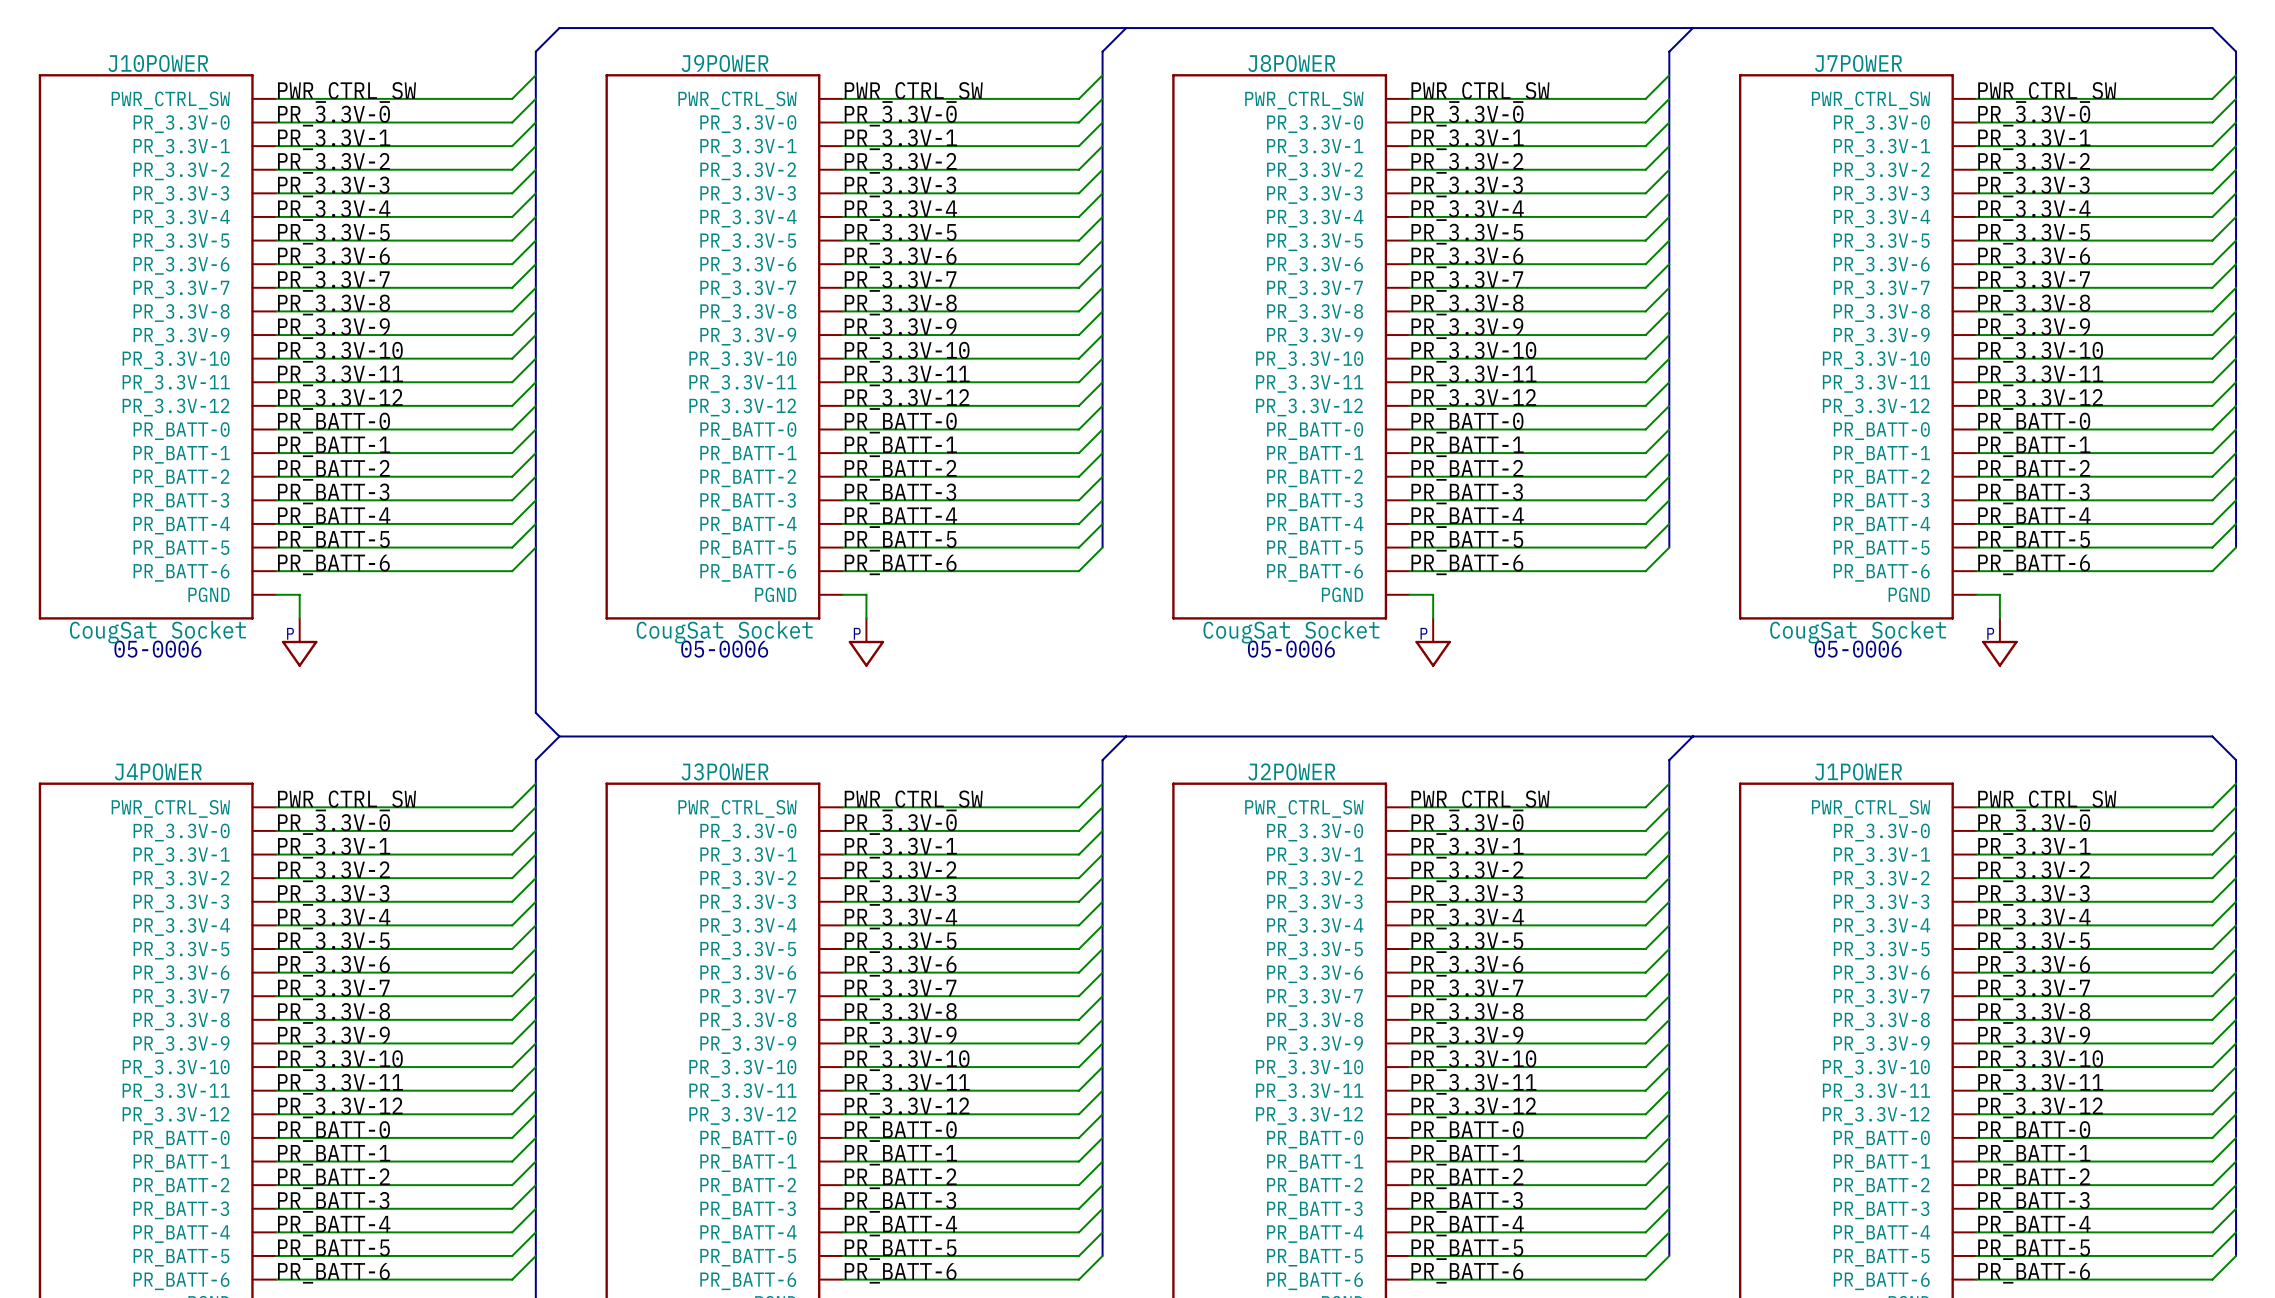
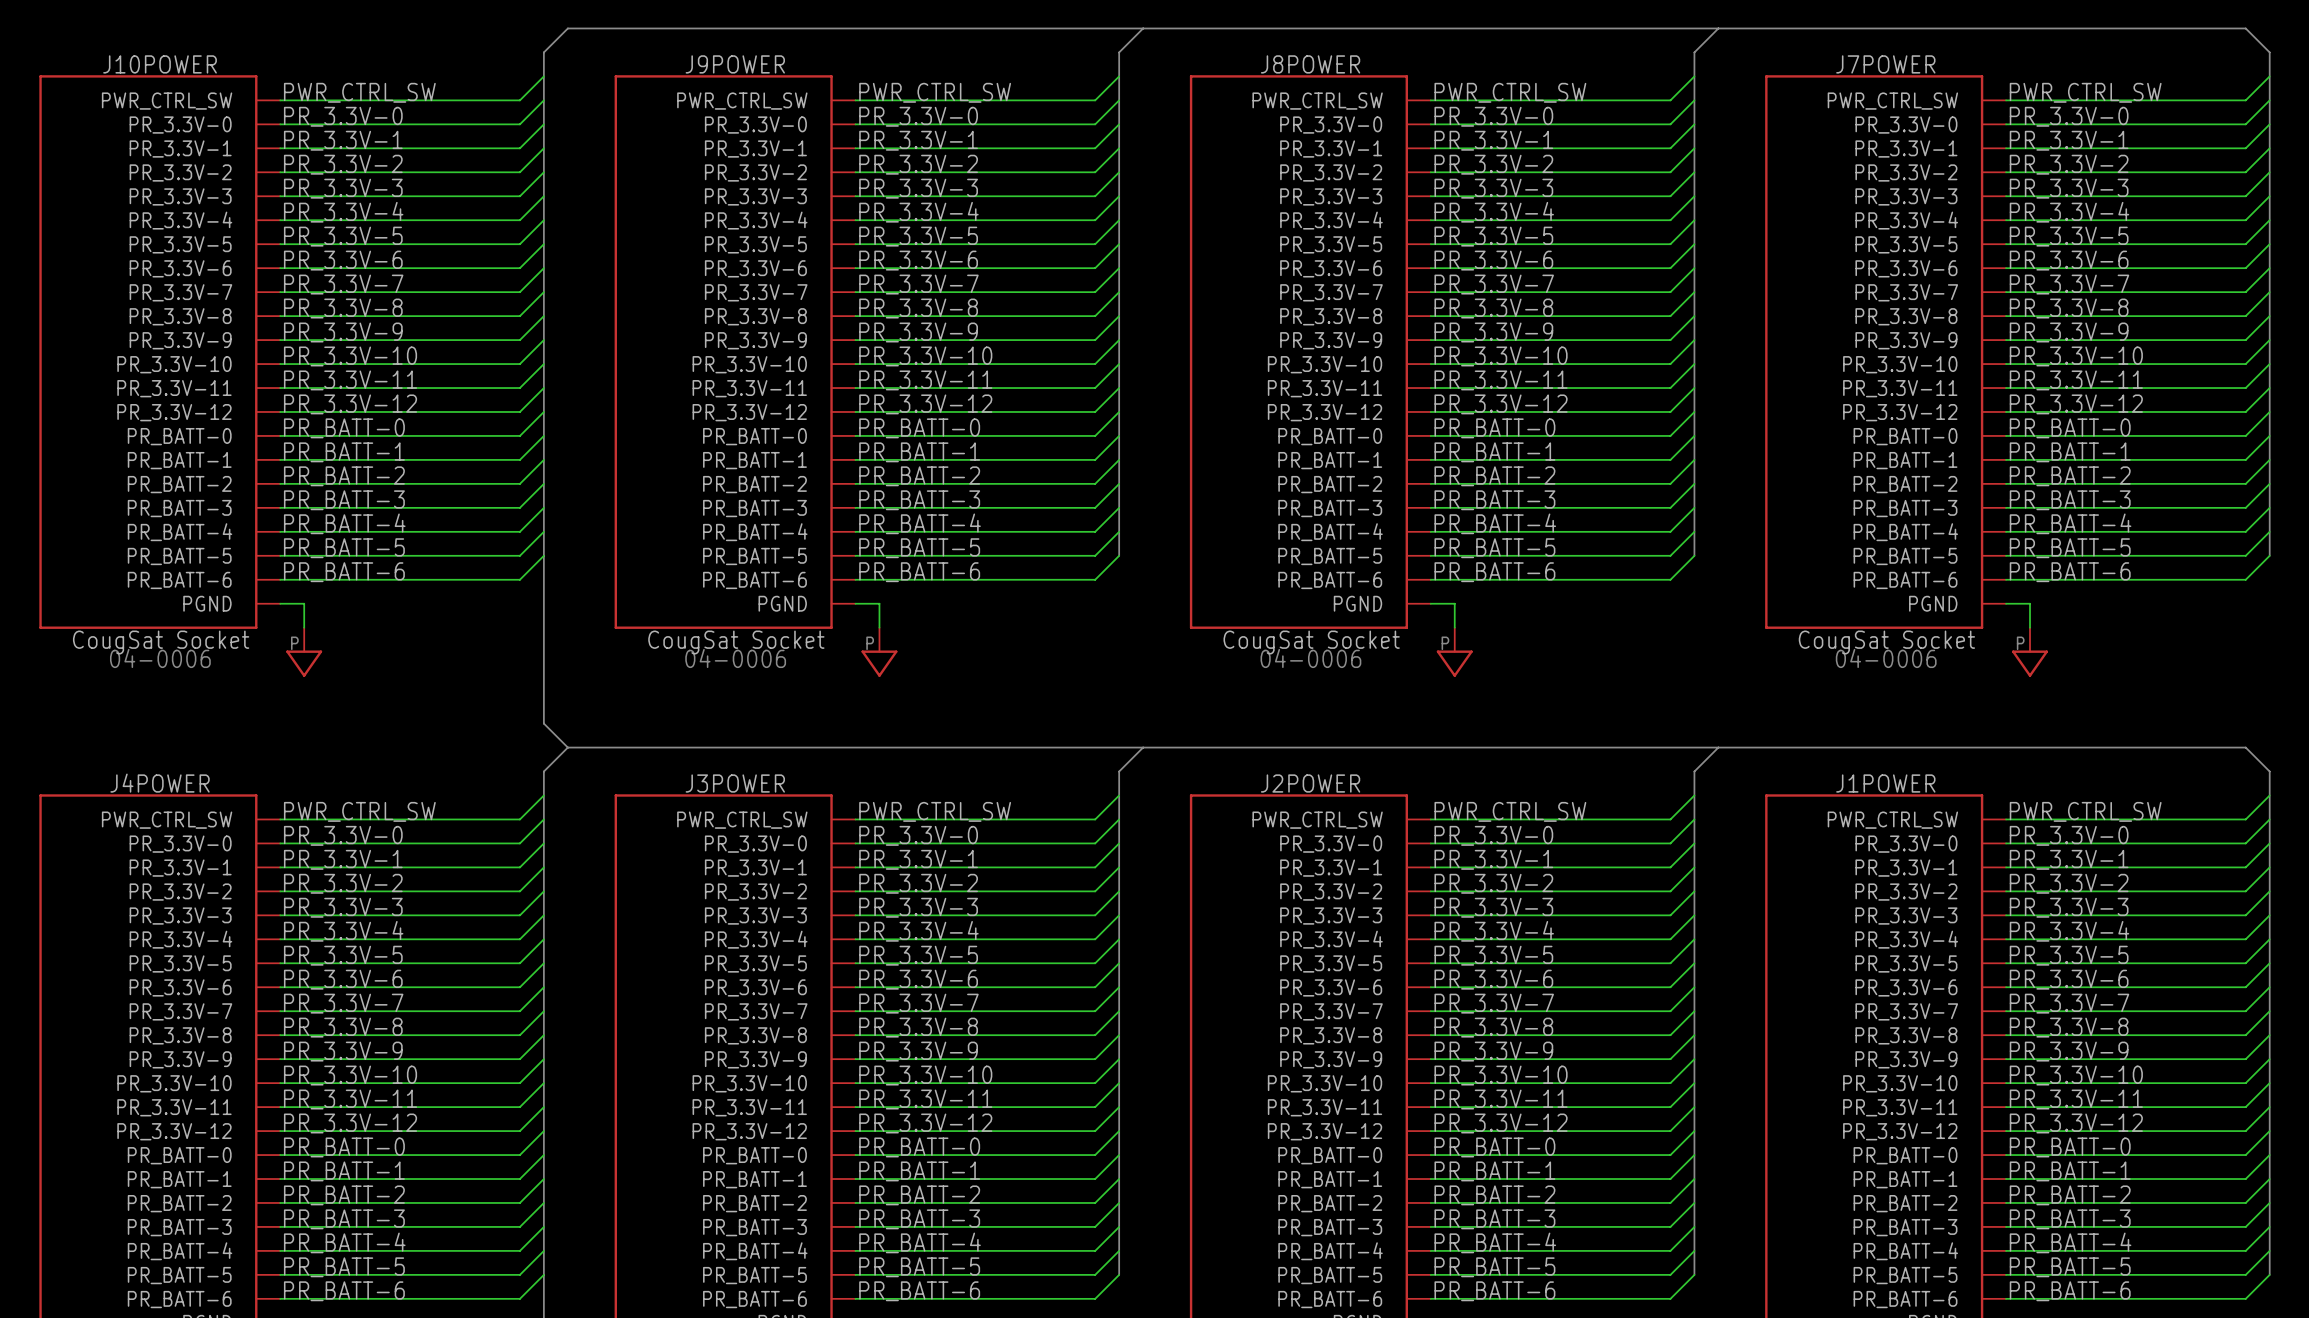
J10POWER text: 05-0006 (157, 649) -> 04-0006 (160, 658)
J9POWER text: 05-0006 (724, 649) -> 04-0006 (735, 658)
J8POWER text: 05-0006 (1291, 649) -> 04-0006 (1310, 658)
J7POWER text: 05-0006 (1858, 649) -> 04-0006 (1886, 658)

